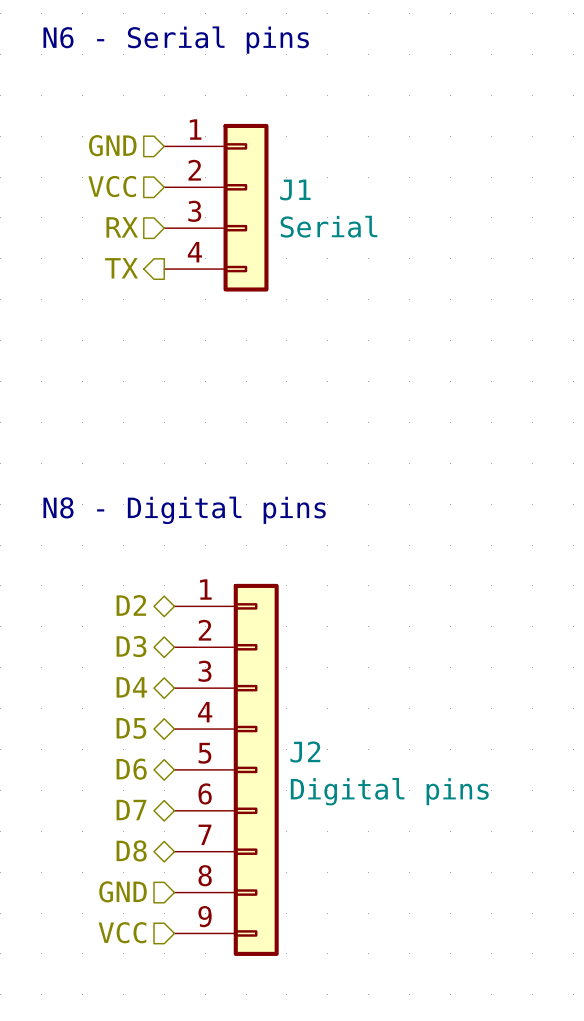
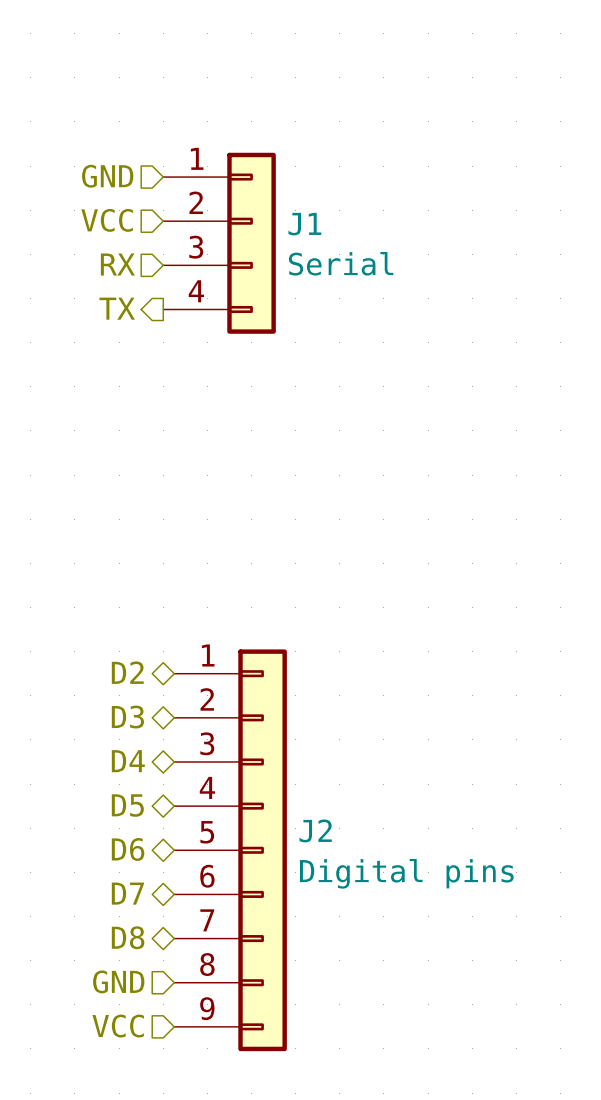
text: N6 - Serial pins (176, 40) -> none
text: N8 - Digital pins (184, 510) -> none

